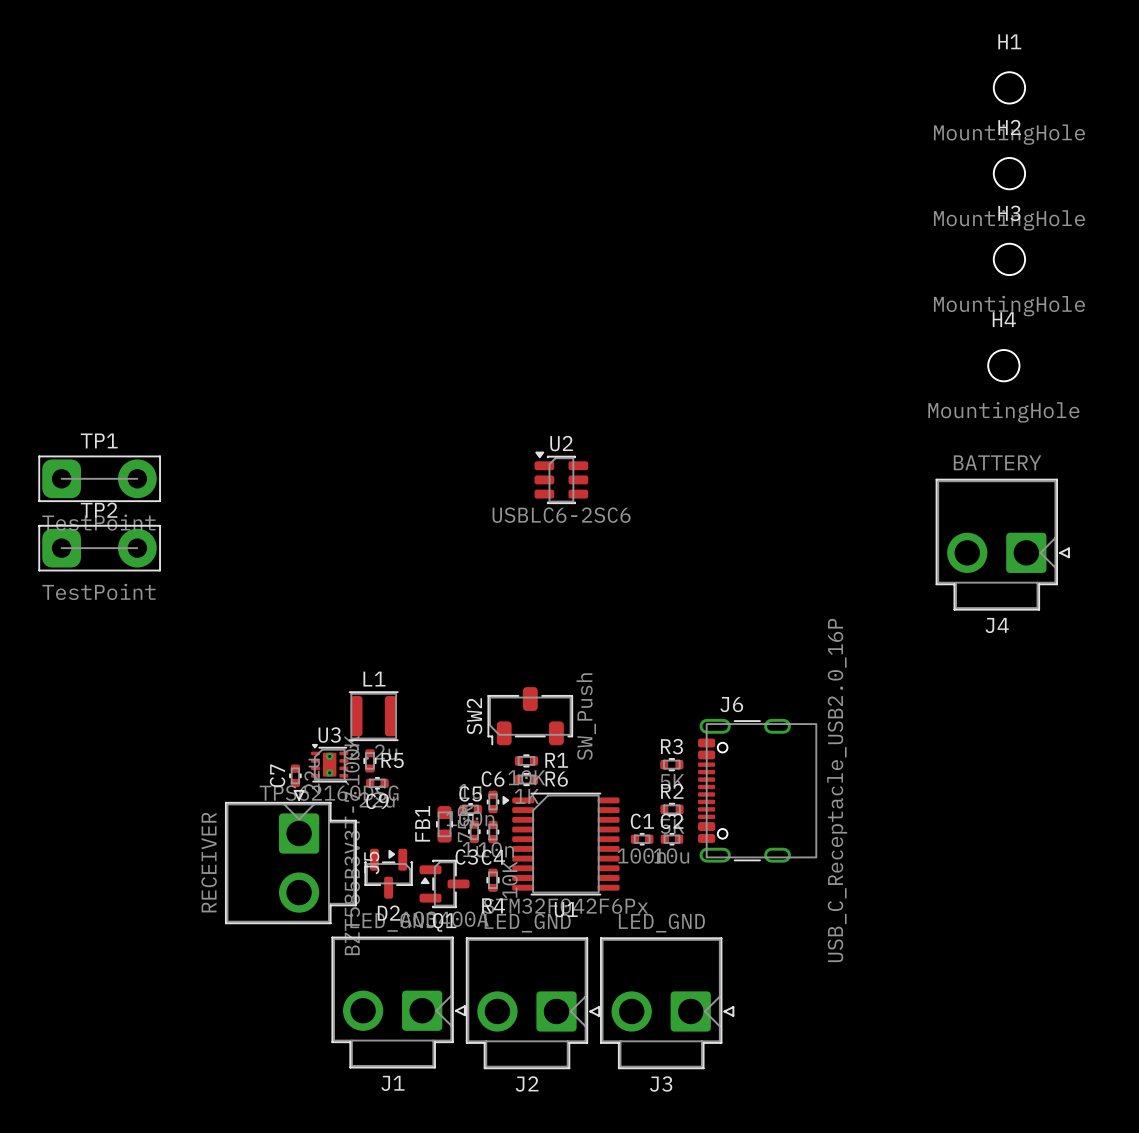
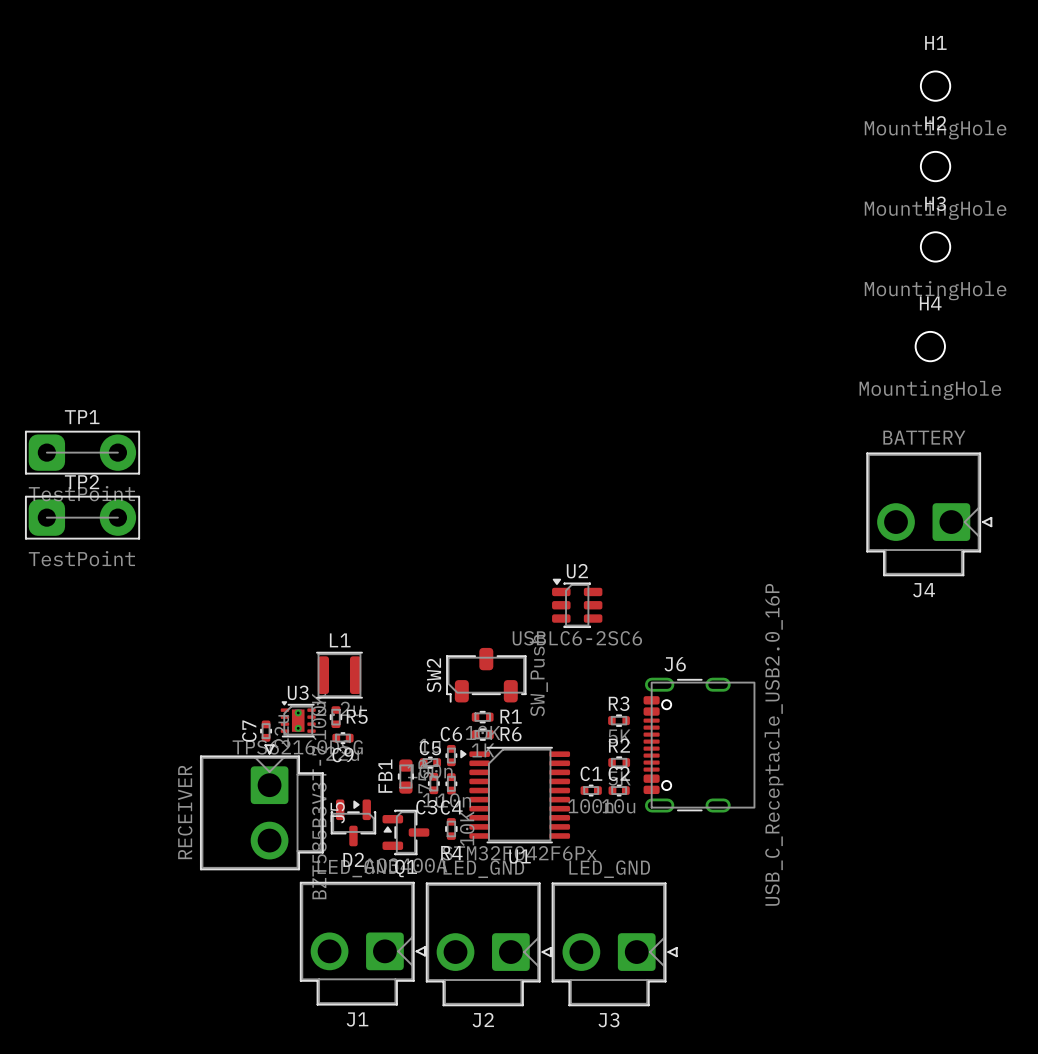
U2 position: (561, 477) -> (577, 603)

